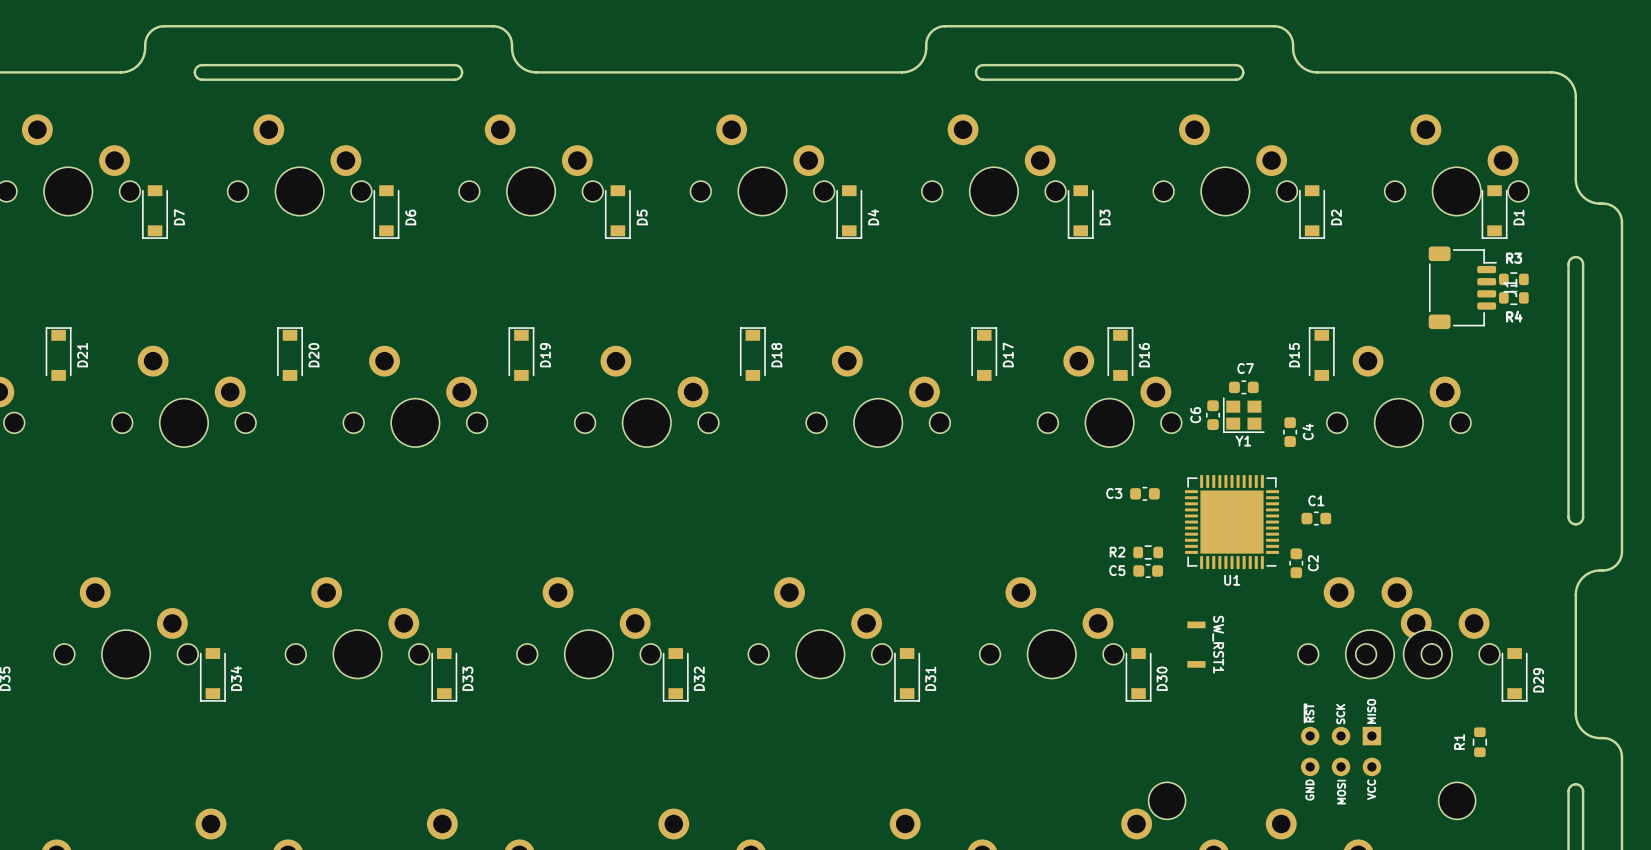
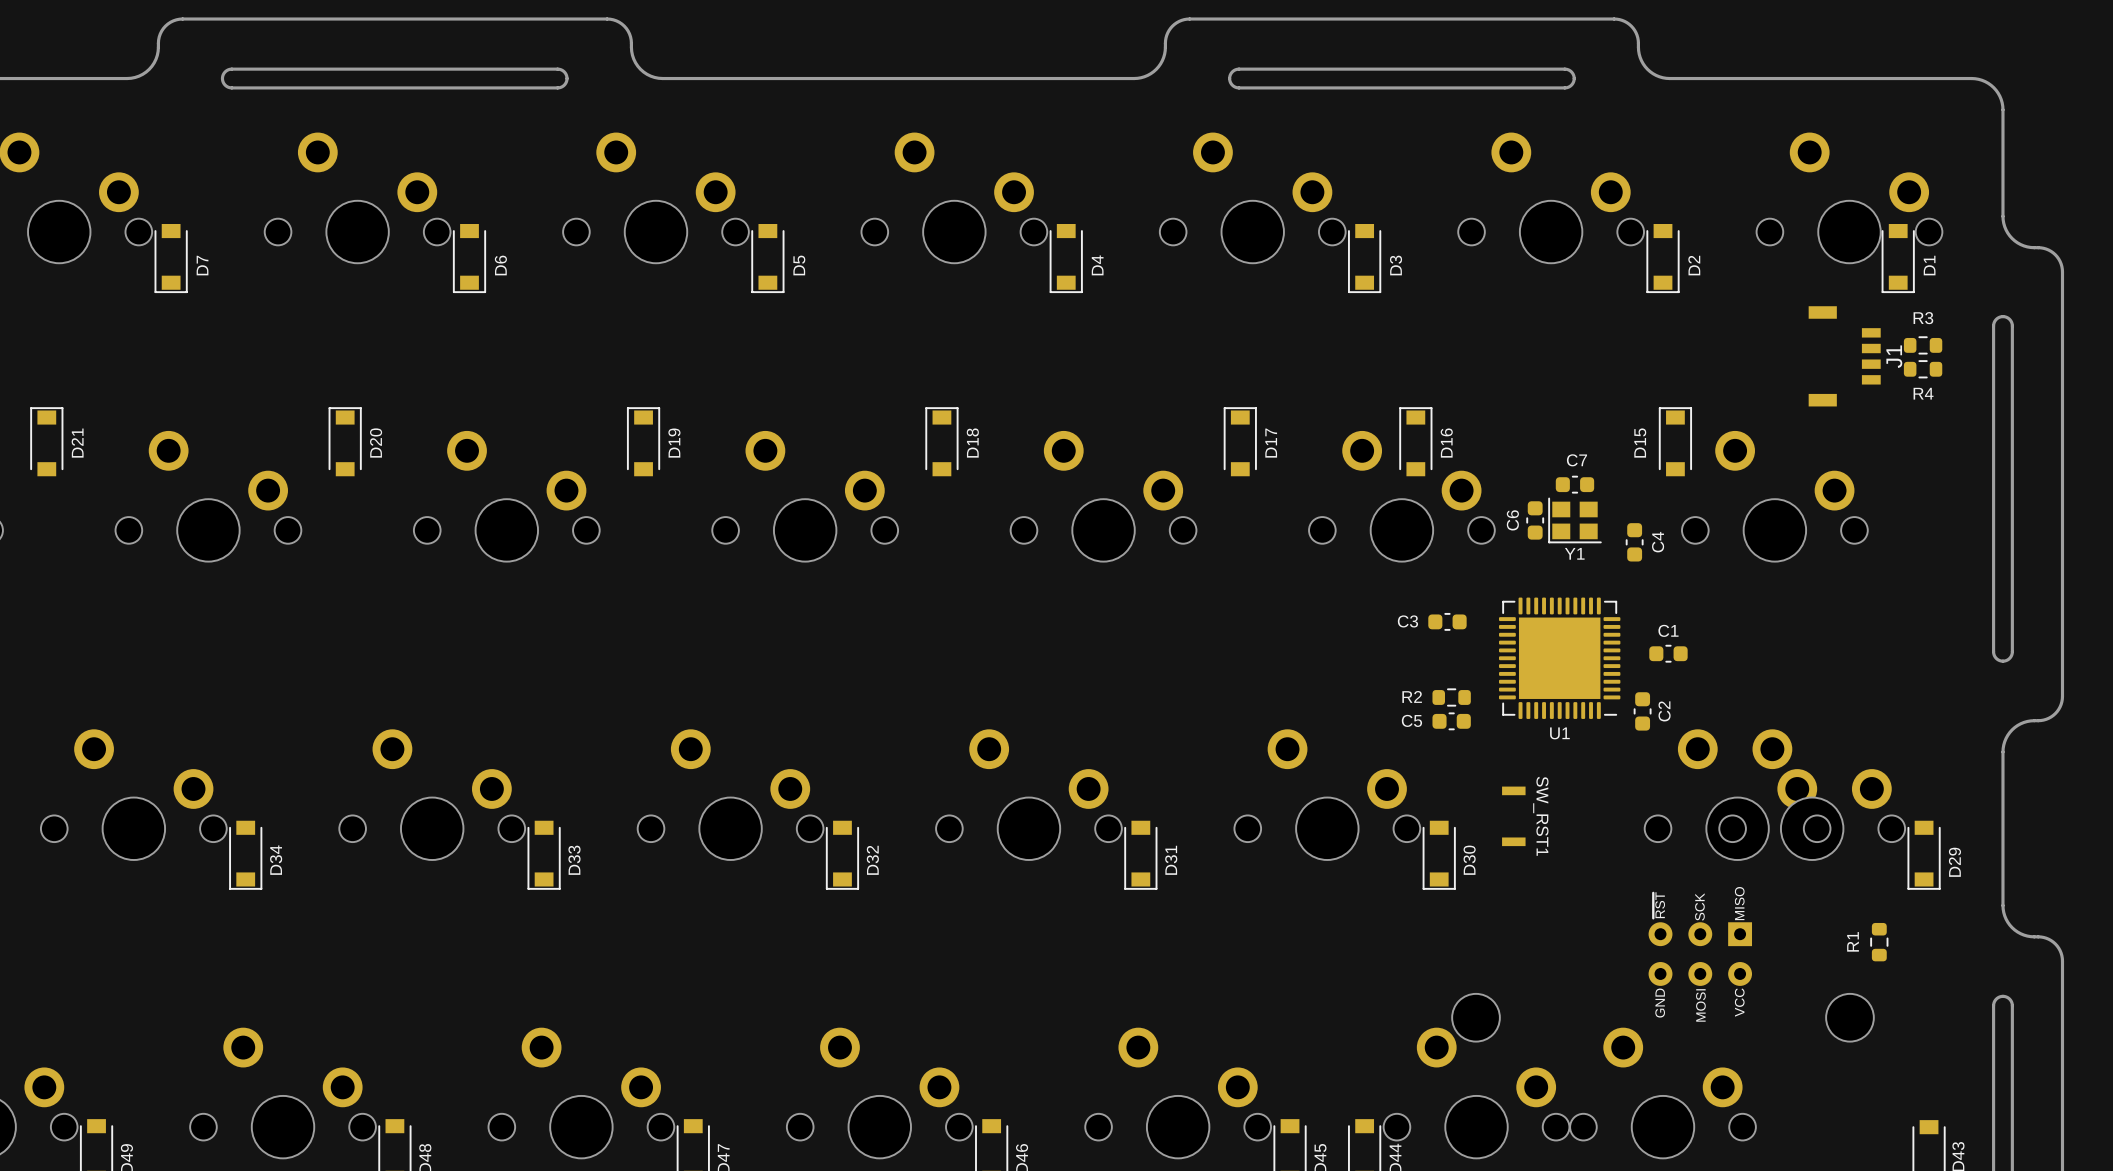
J1 footprint: [1428, 246, 1497, 330] -> [1808, 306, 1881, 407]

